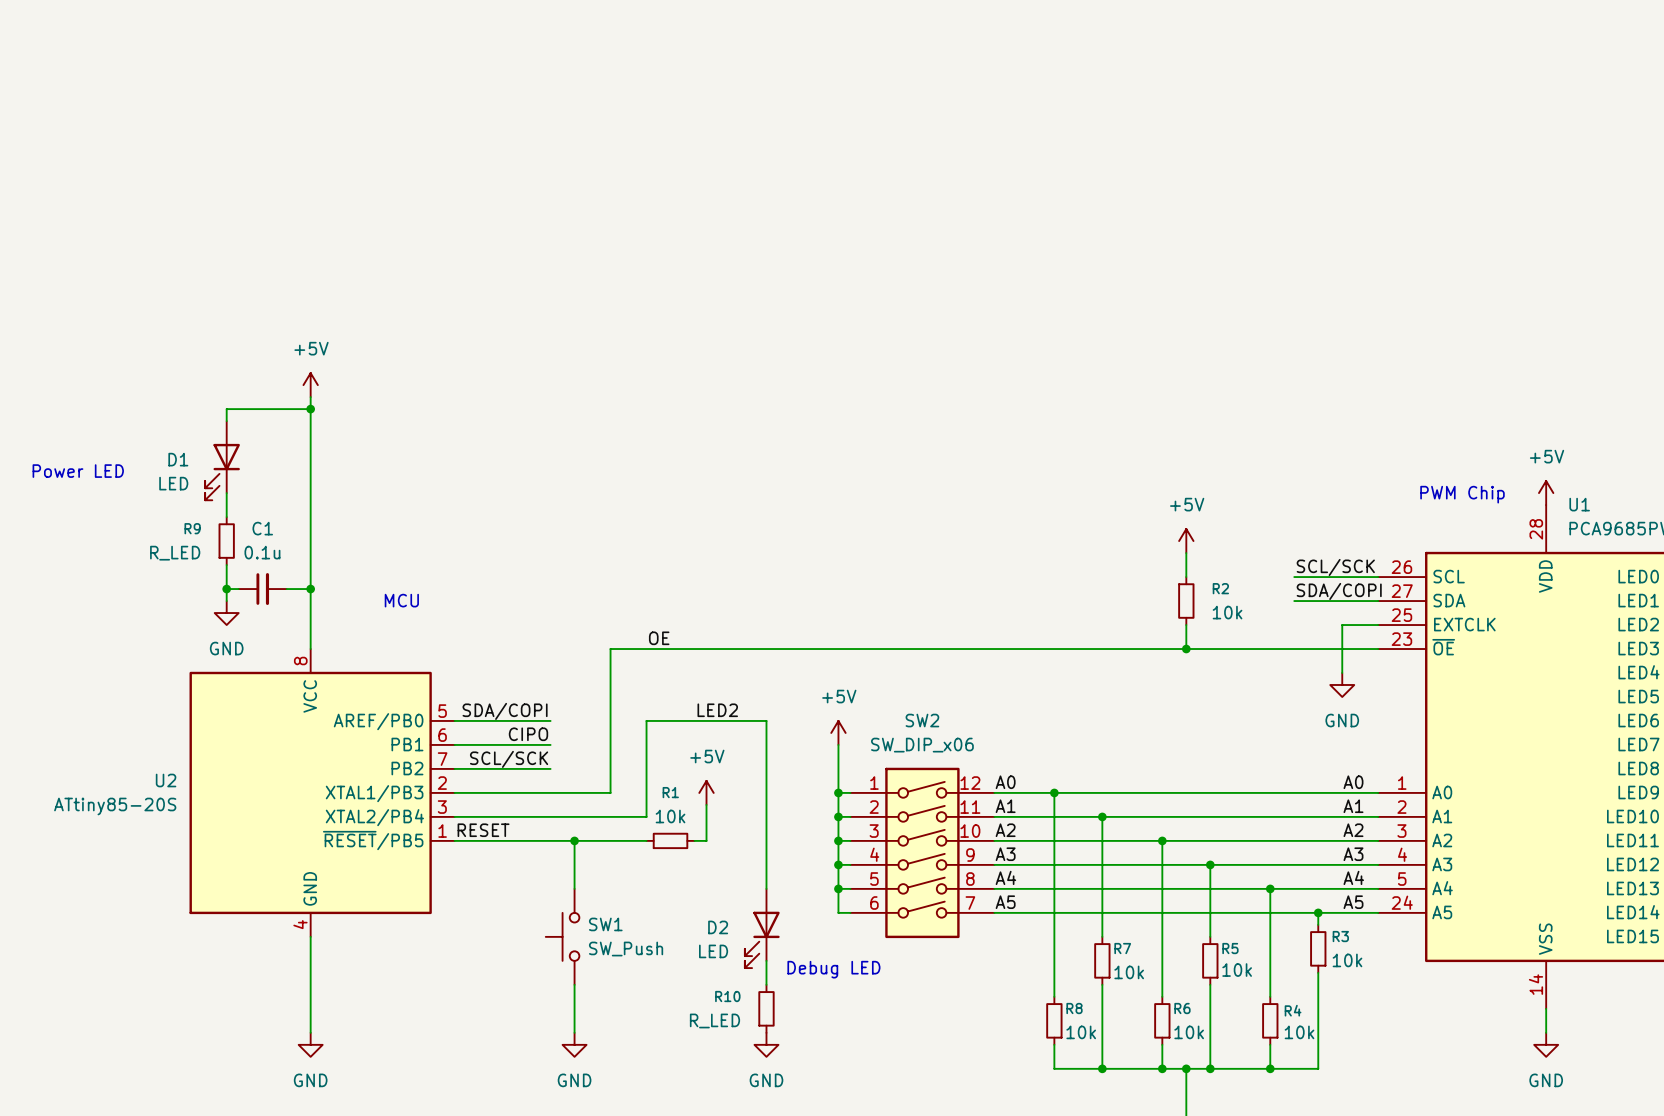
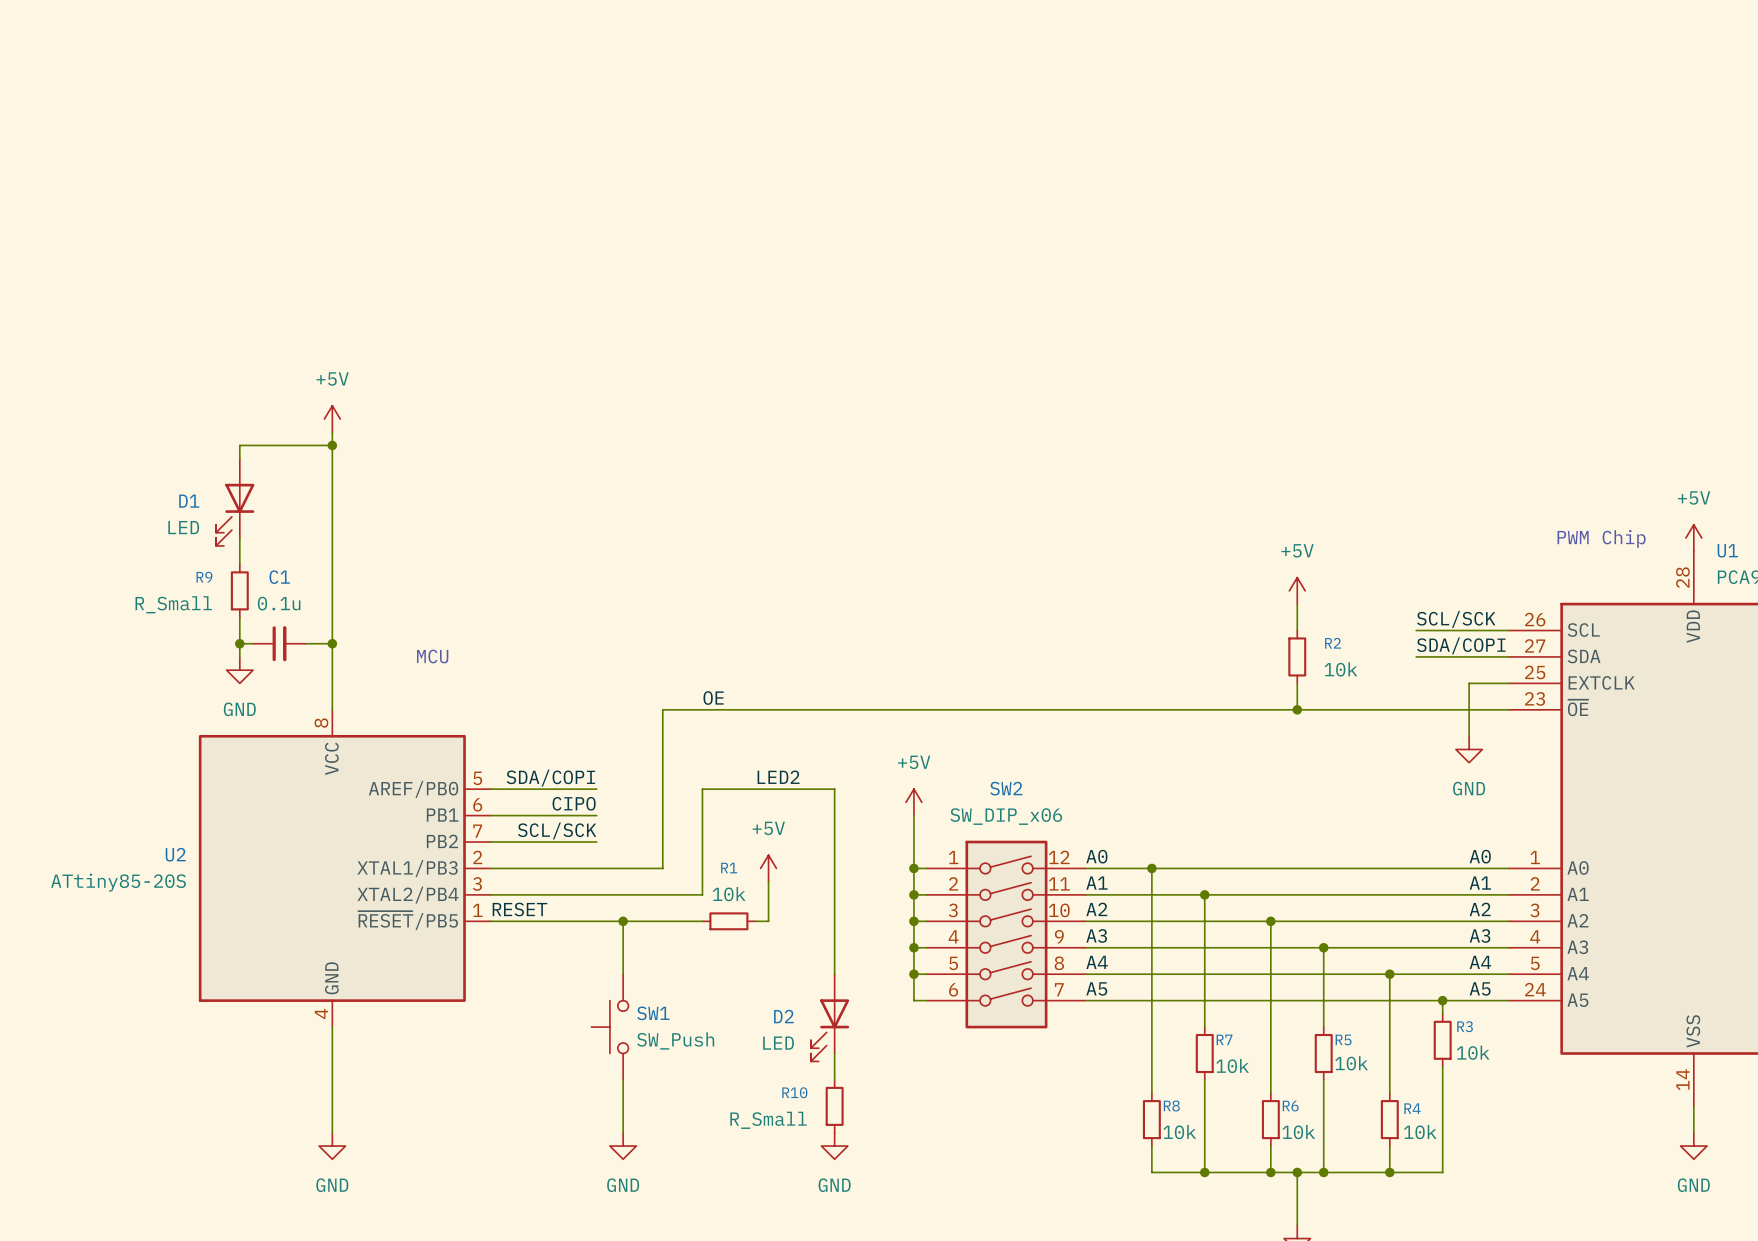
text: Power LED (78, 471) -> none
R9 value: R_LED (175, 553) -> R_Small (173, 604)
text: Debug LED (833, 969) -> none
R10 value: R_LED (714, 1020) -> R_Small (768, 1120)

